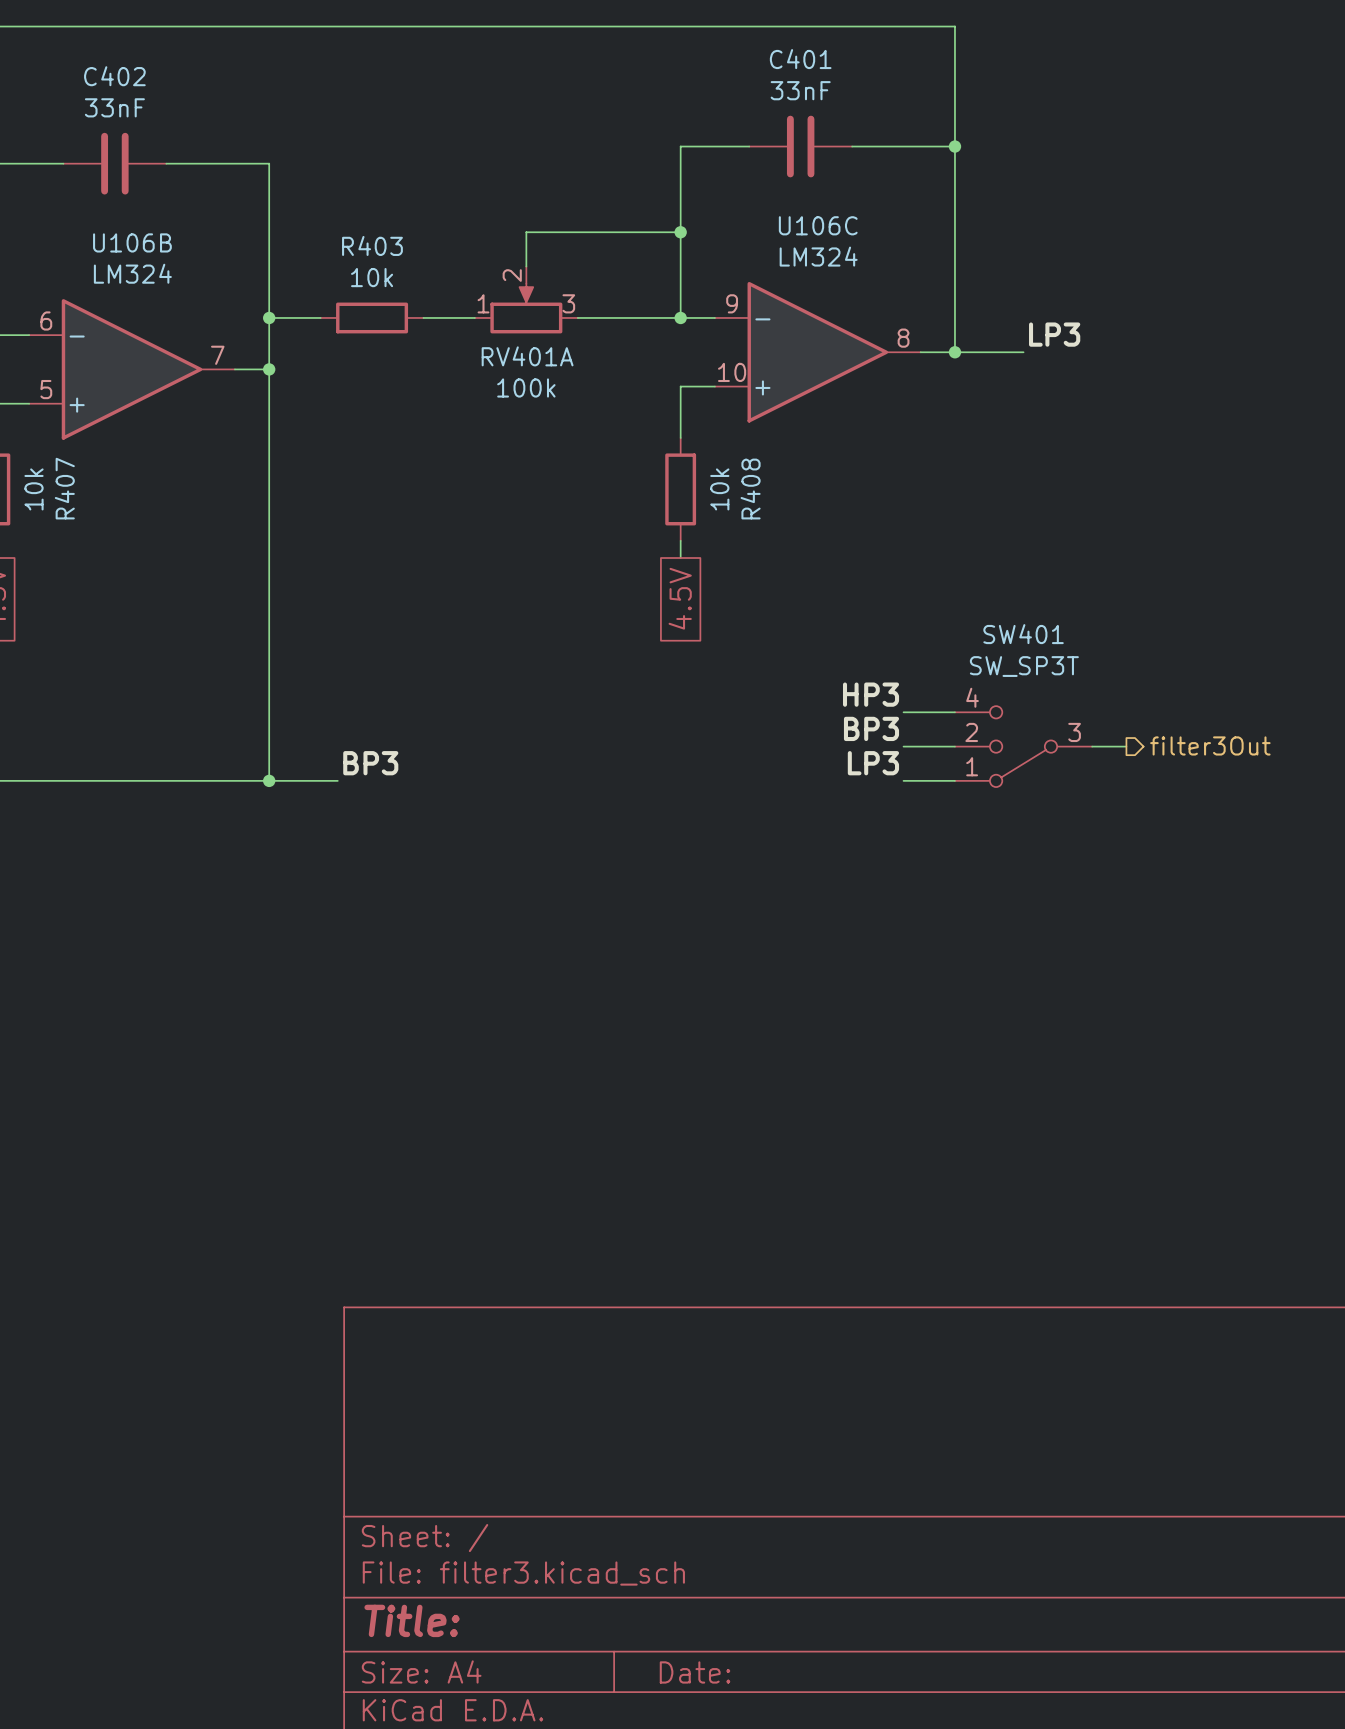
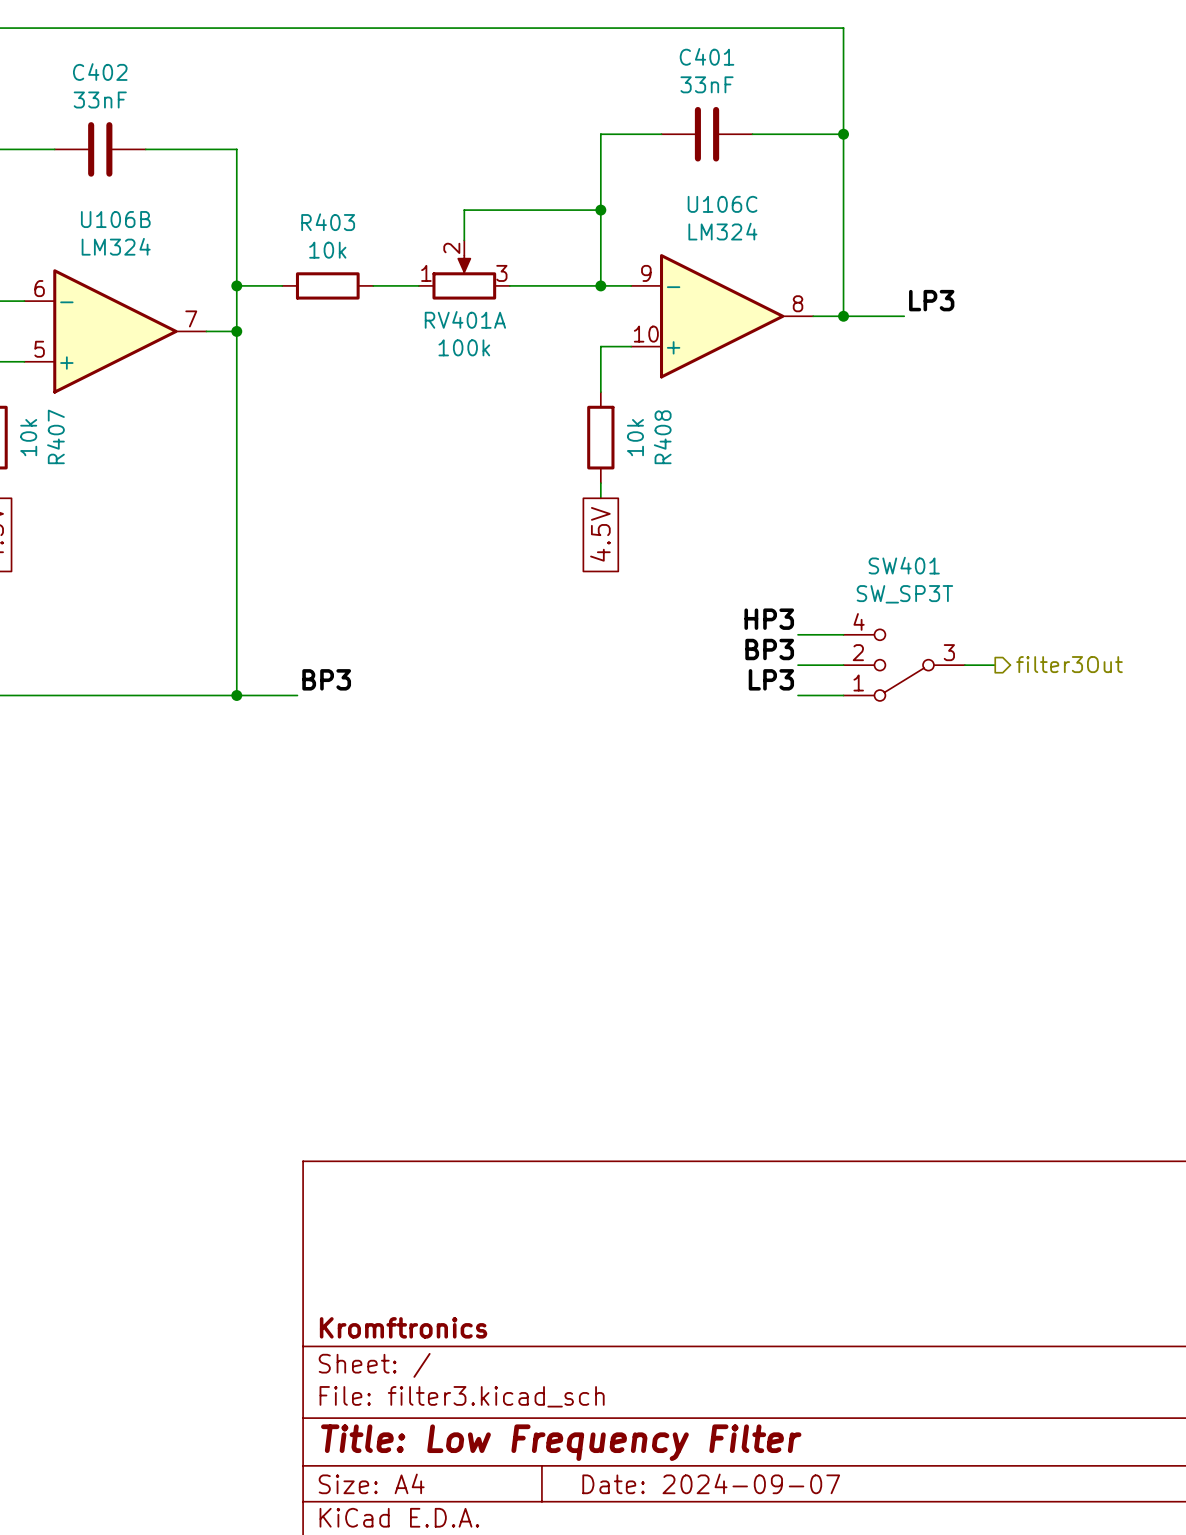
title block: none -> Kromftronics (403, 1327)
title block: Title: (412, 1620) -> Title: Low Frequency Filter (561, 1442)
title block: Date: (695, 1672) -> Date: 2024-09-07 (711, 1483)

